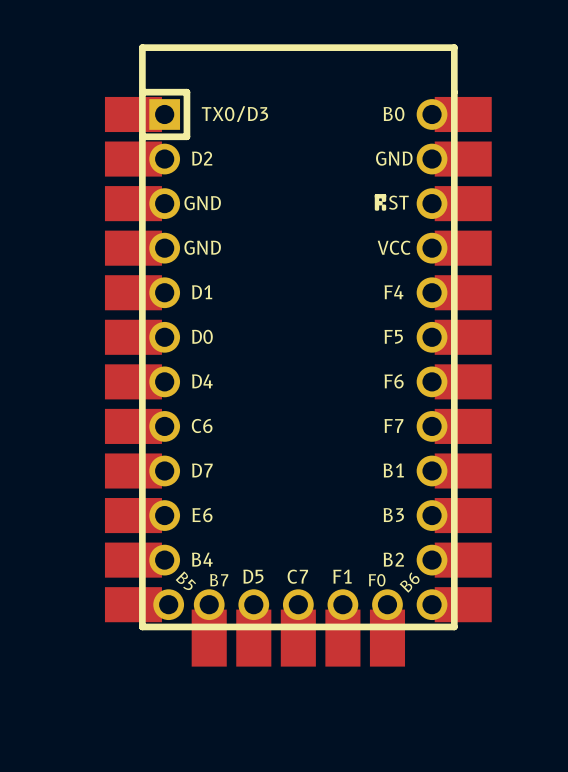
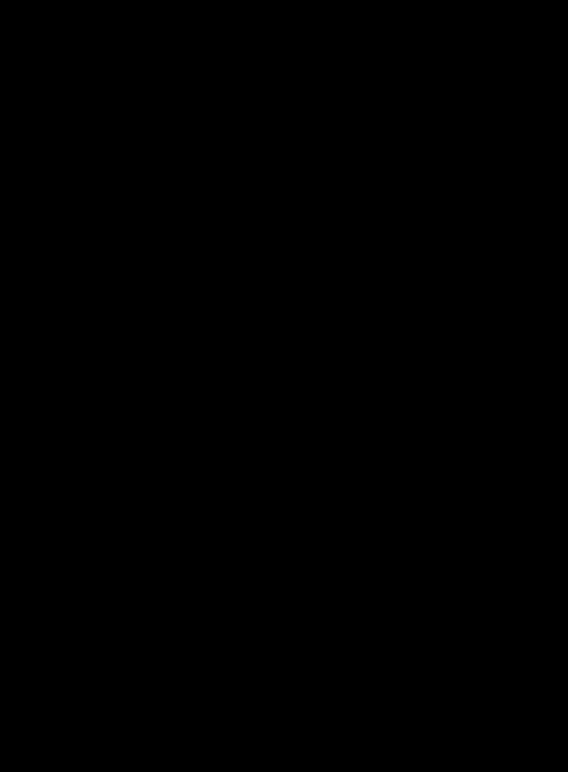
part: (298, 355) -> none

